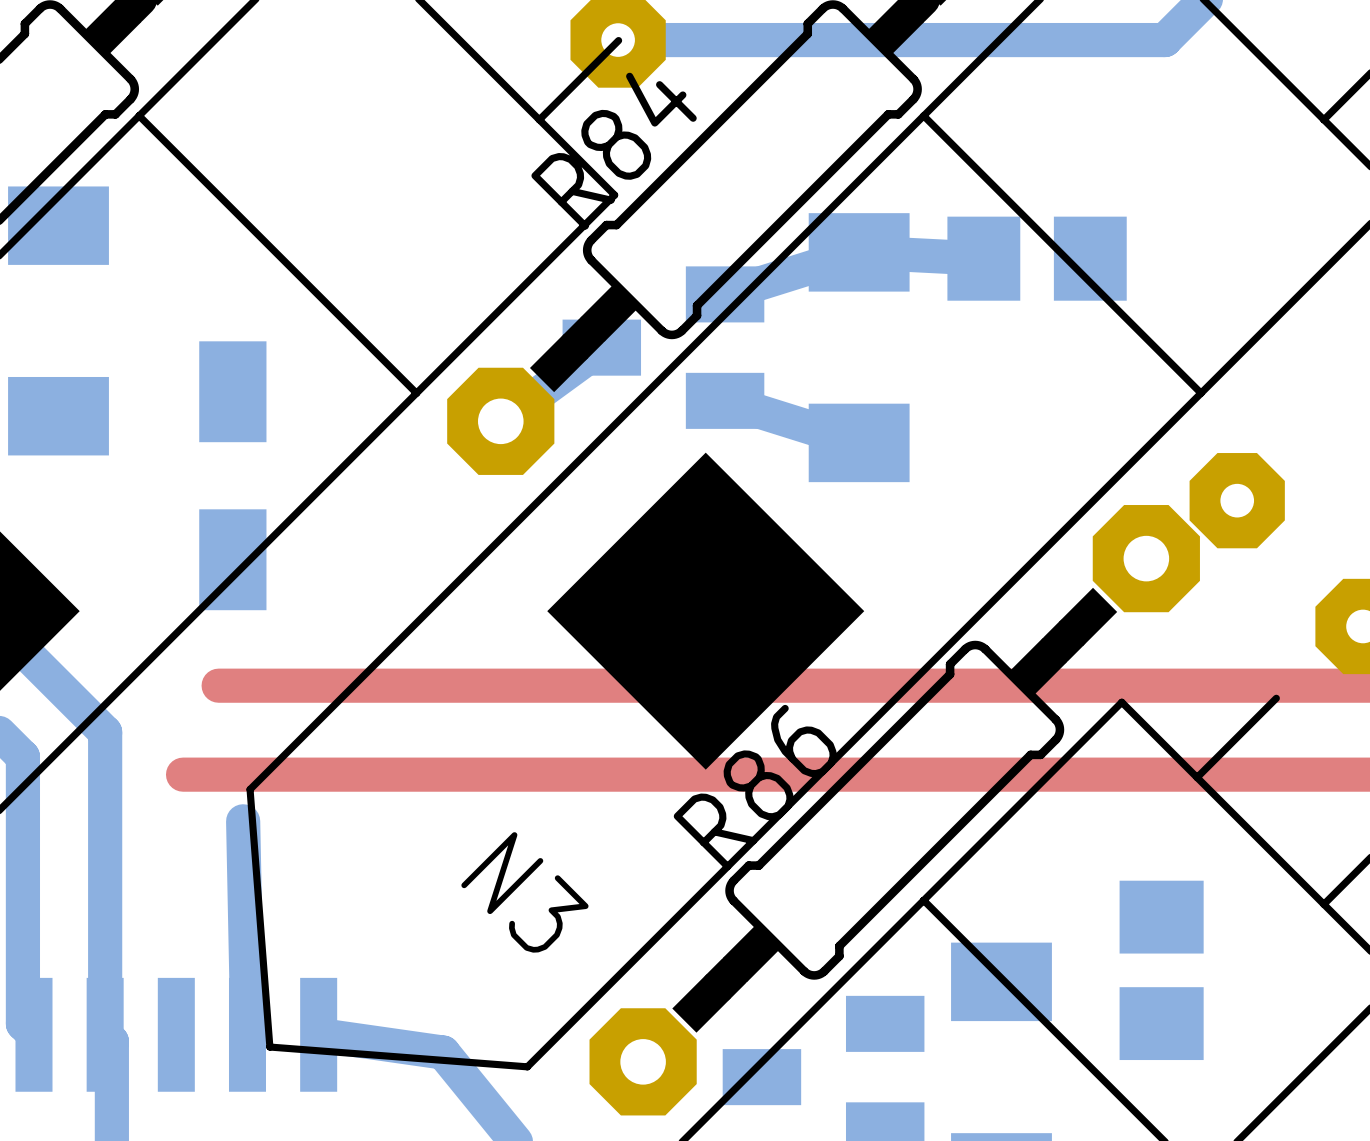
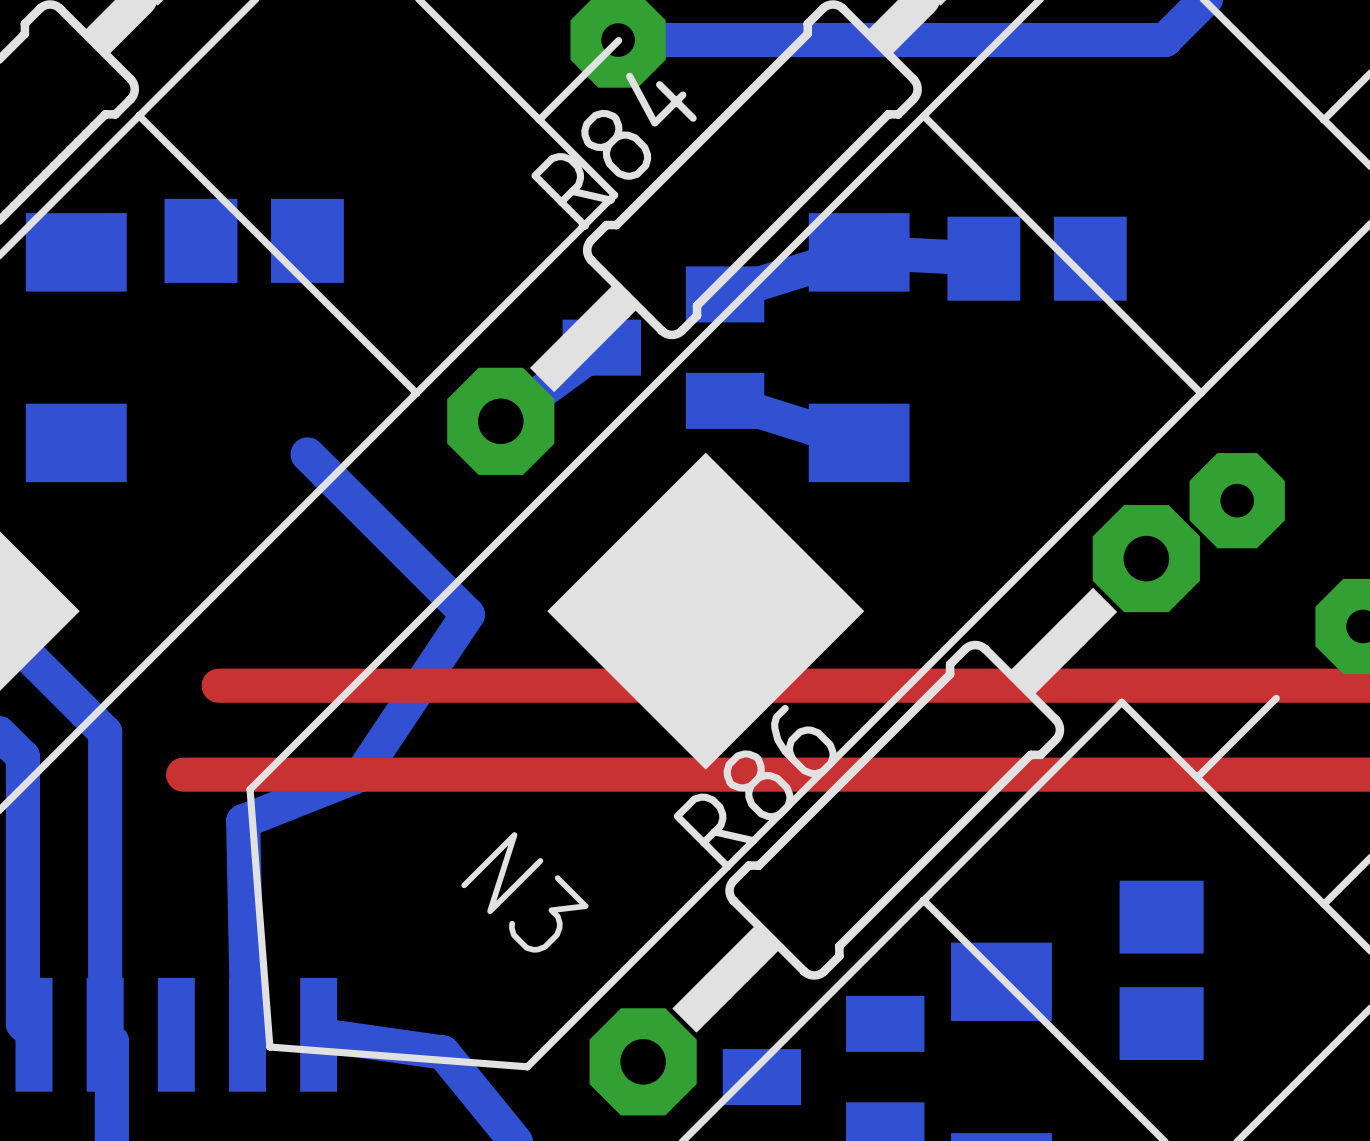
part: none -> (254, 240)
part position: (58, 320) -> (76, 347)
bottom track: none -> (307, 454) (467, 614) (360, 774) (243, 821)
part: (232, 475) -> none

